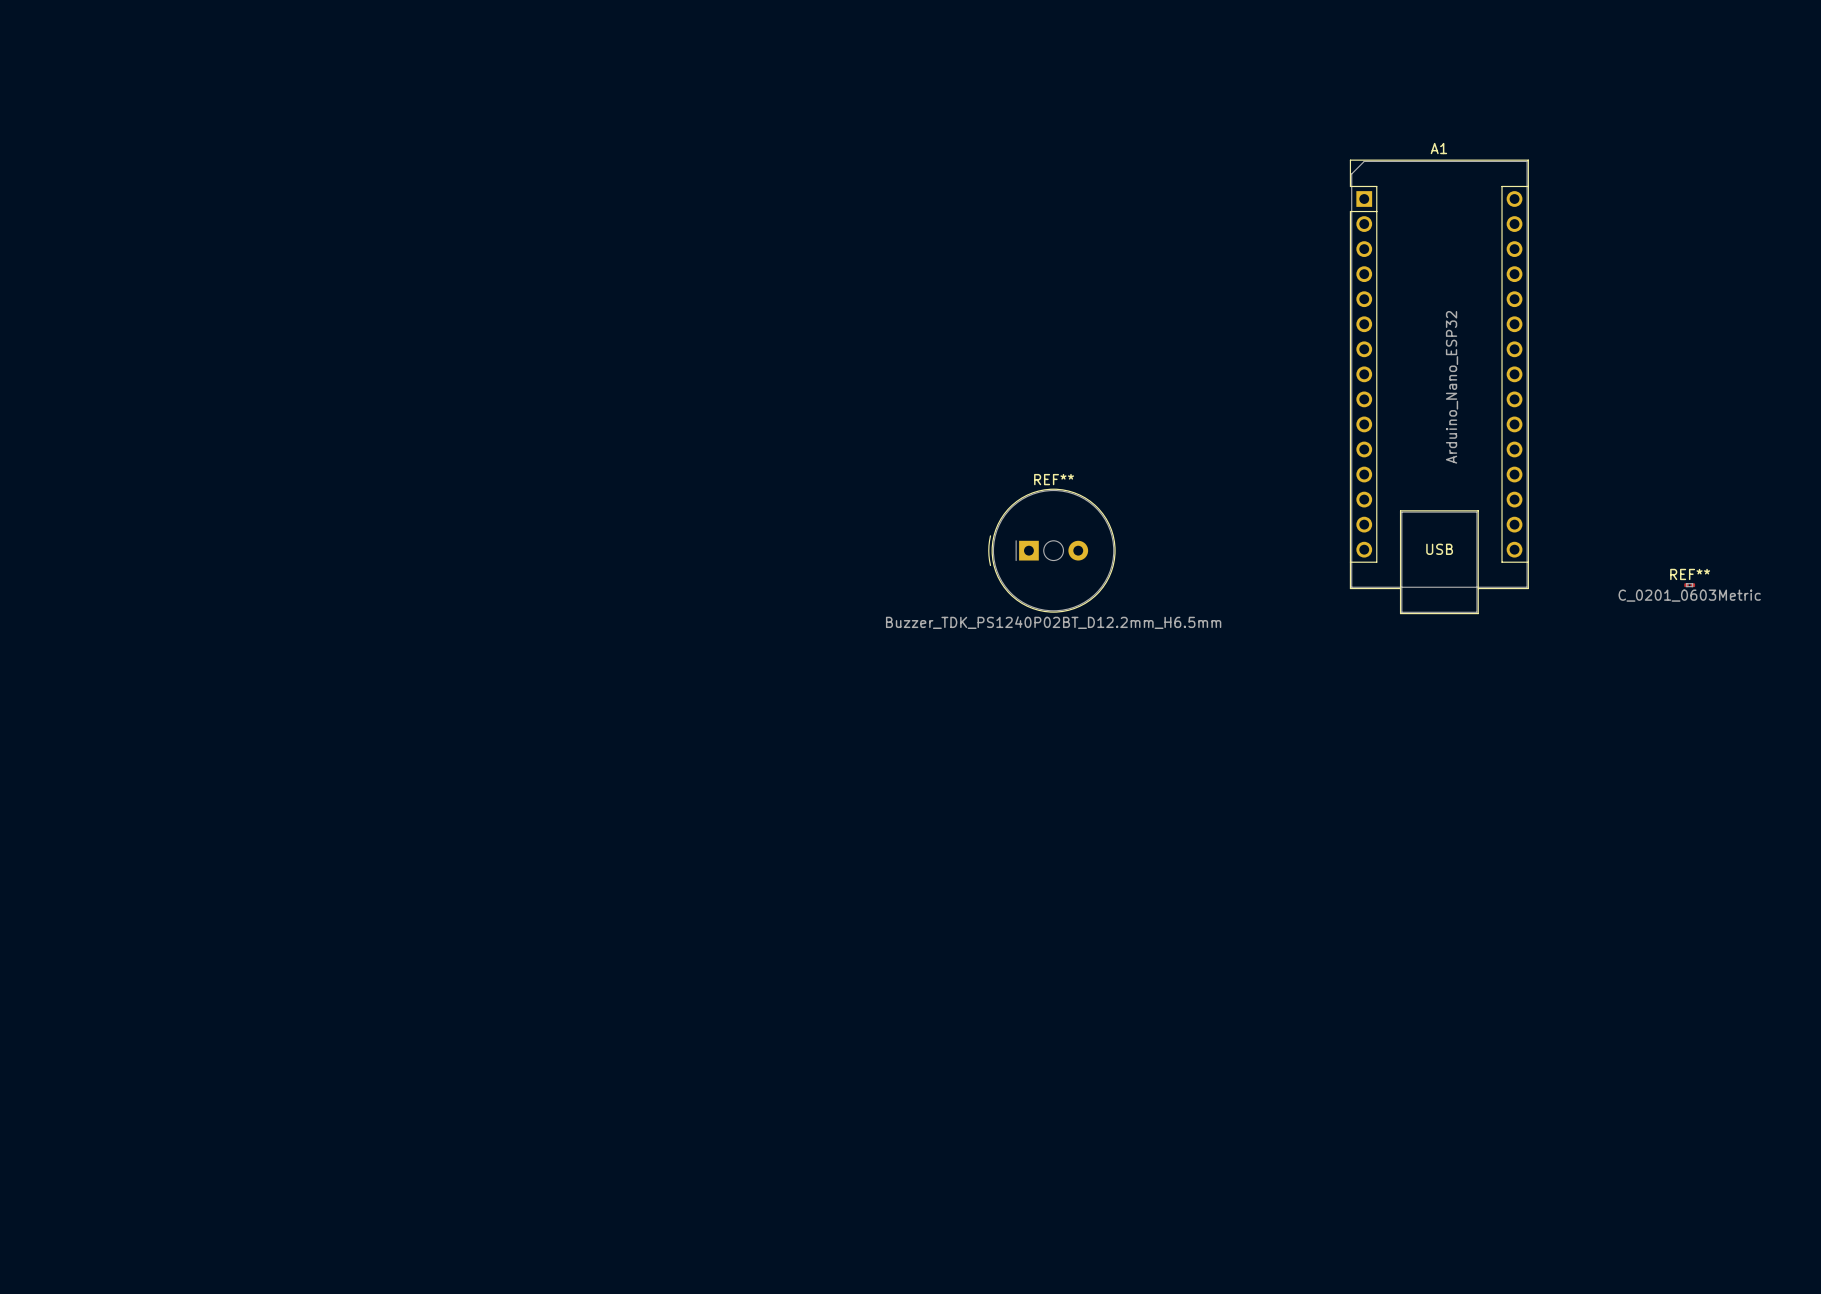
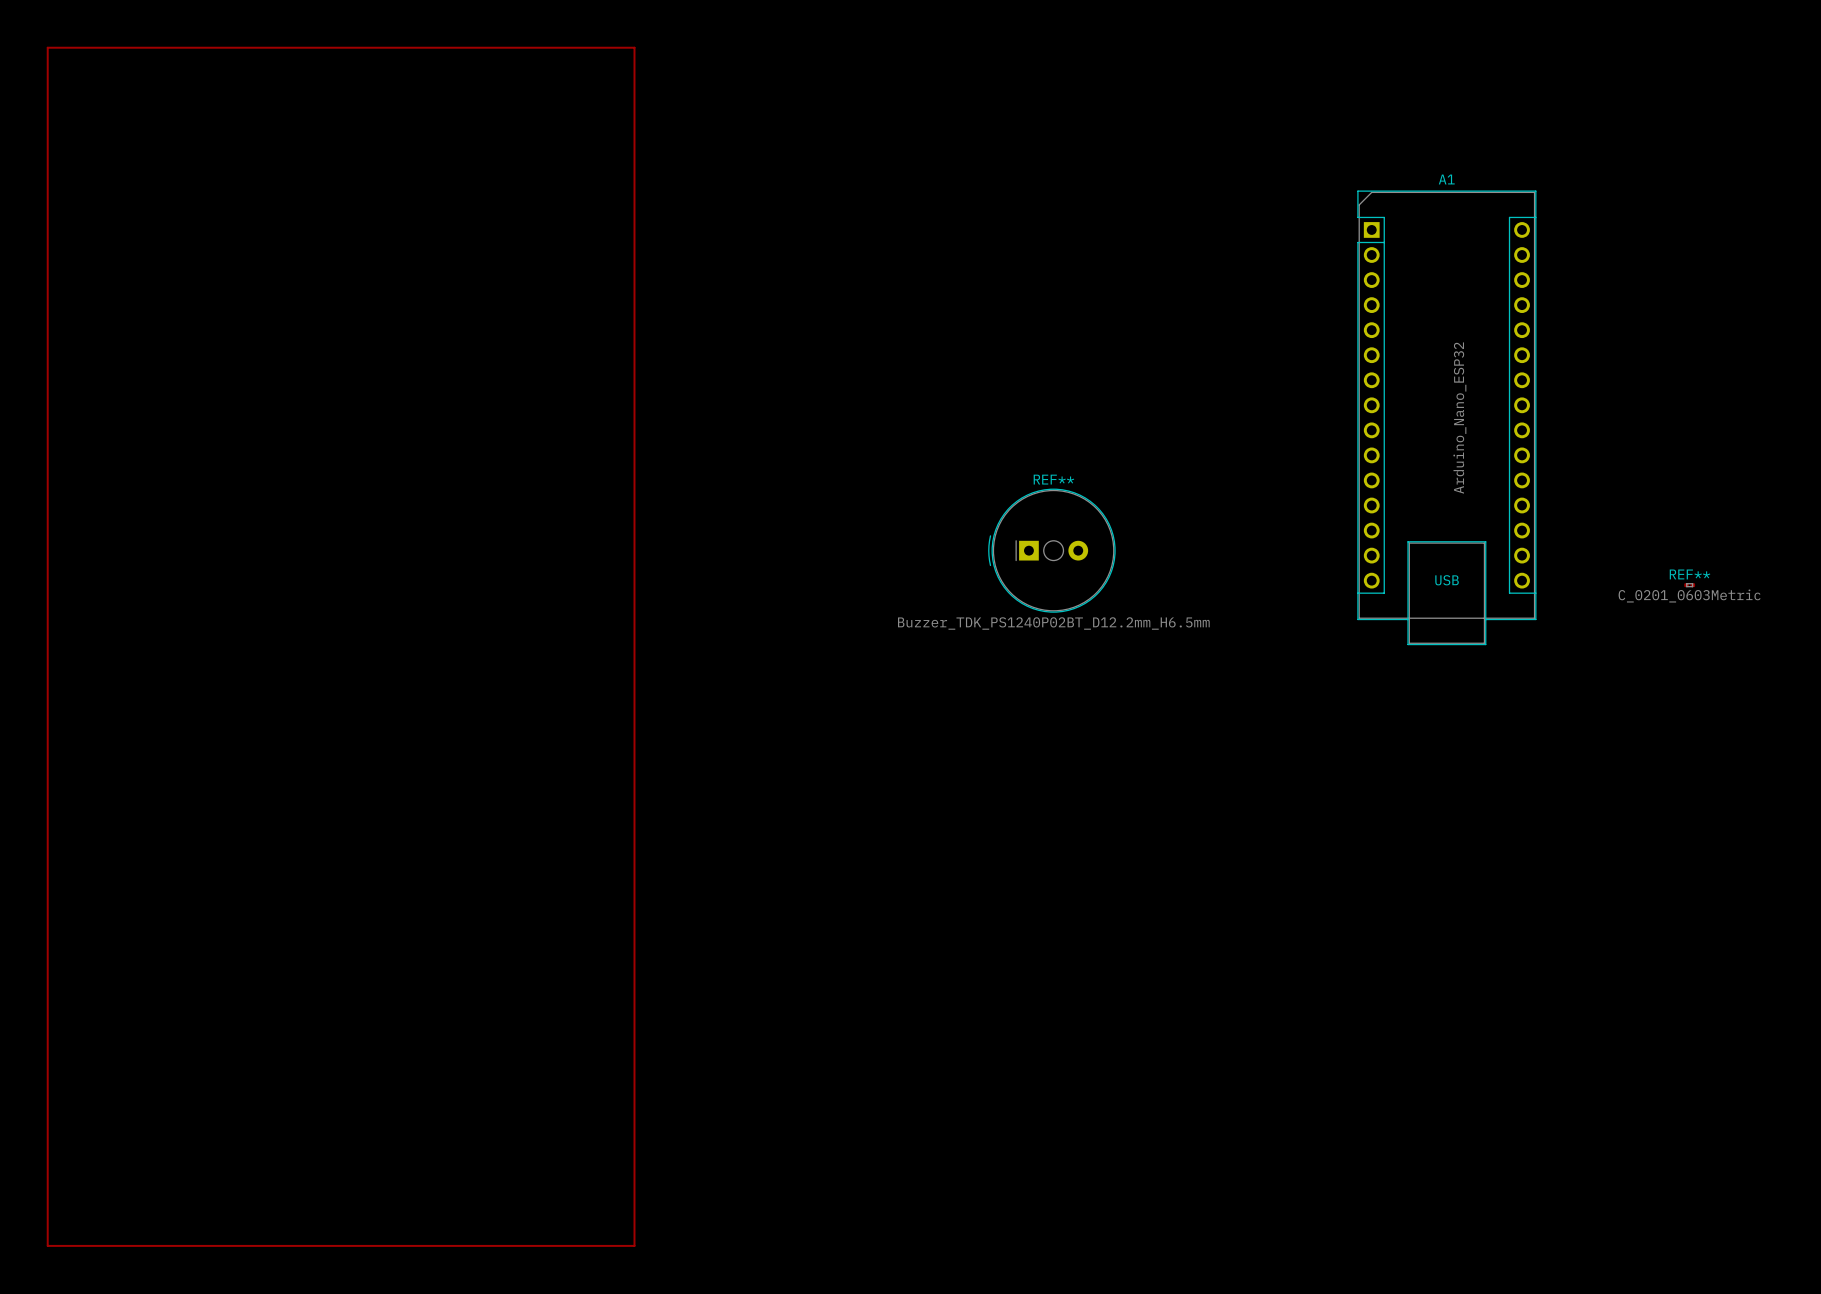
track: none -> (47, 47) (634, 47) (634, 1245) (47, 1245) (47, 47)
A1 position: (1439, 386) -> (1446, 417)

